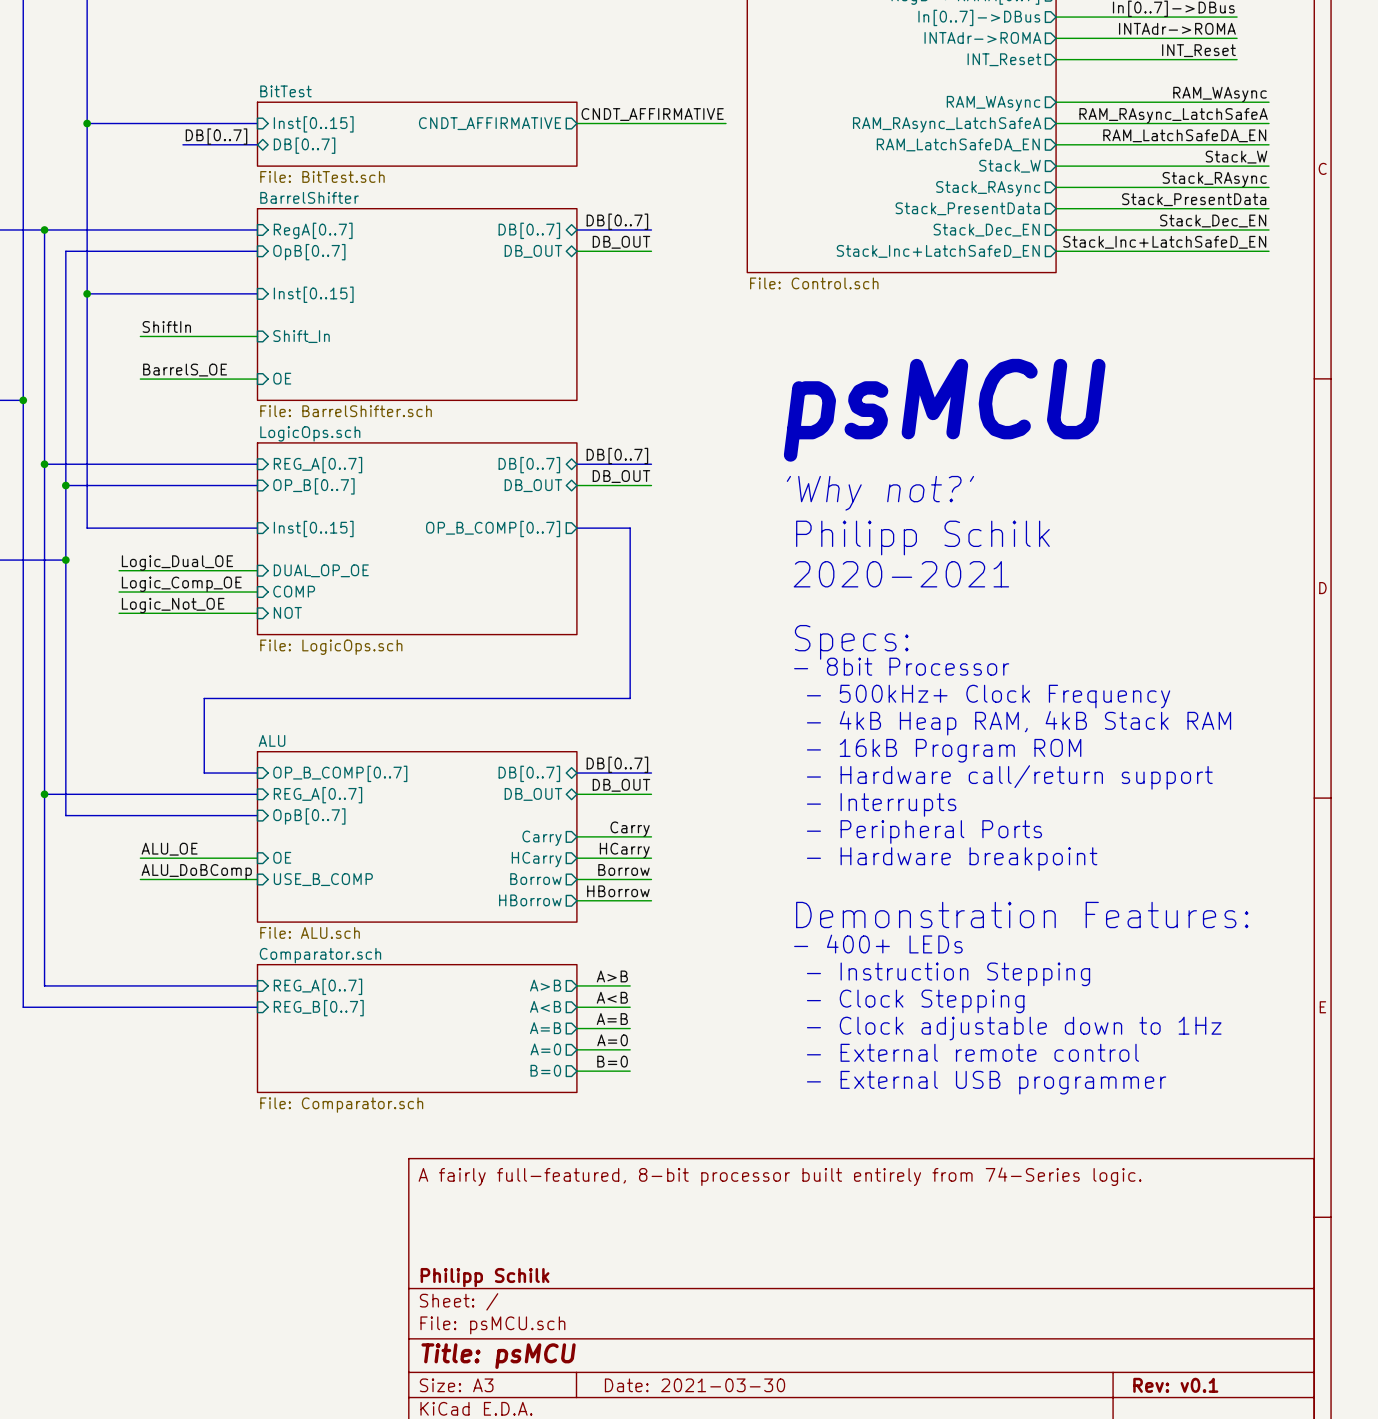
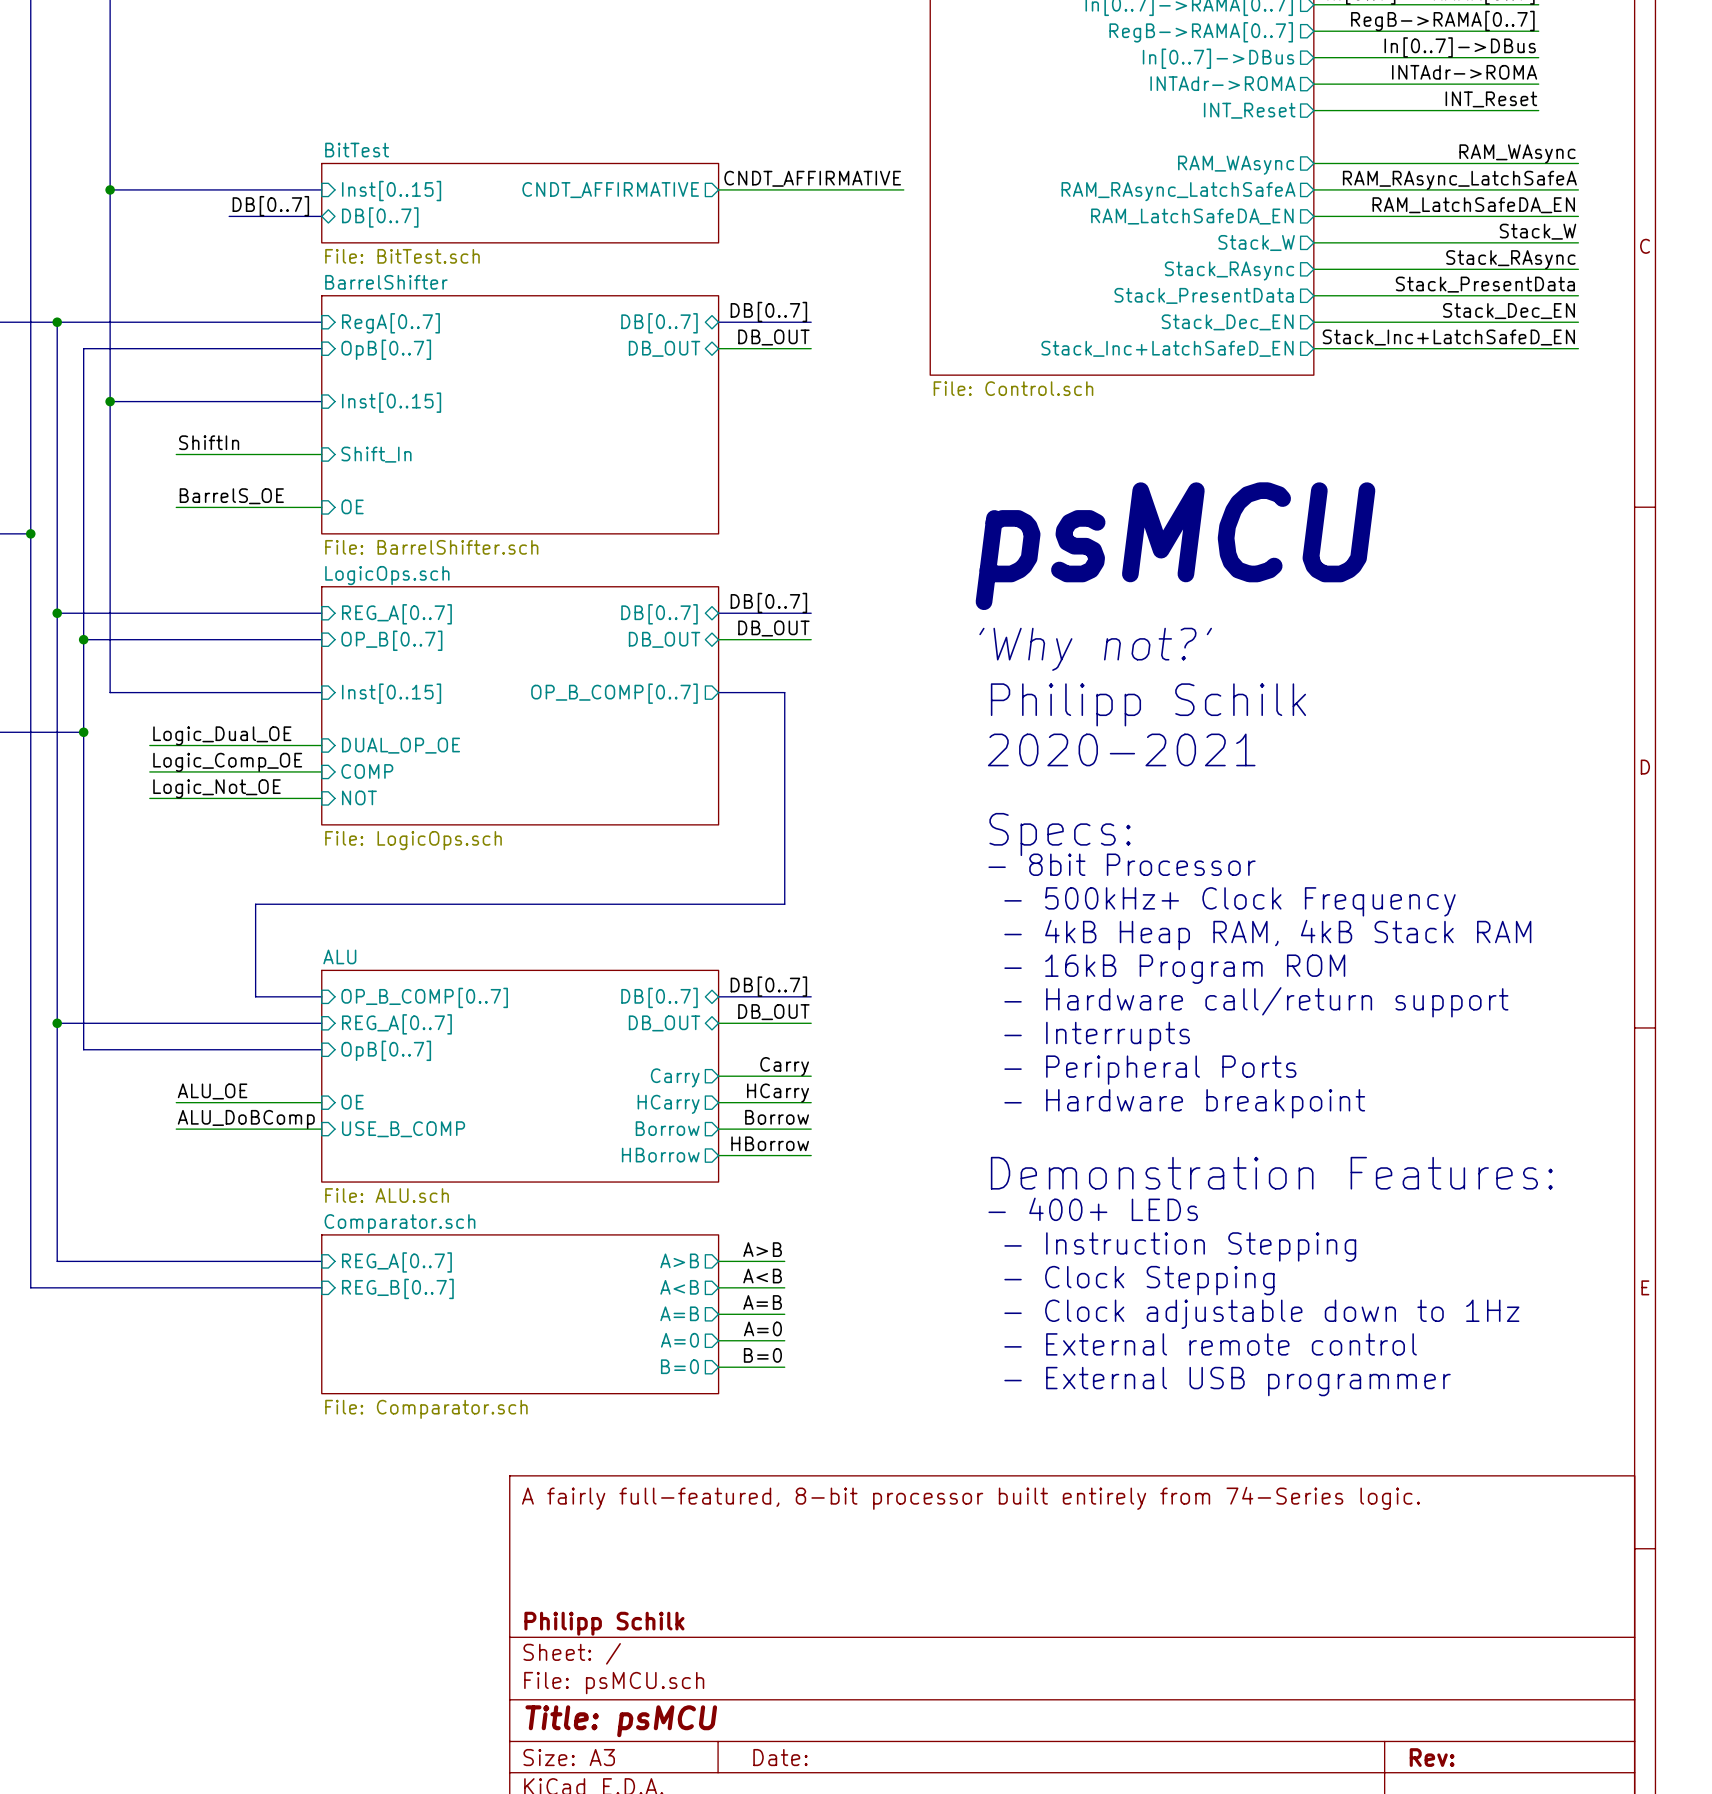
title block: Date: 2021-03-30 (695, 1385) -> Date: (780, 1757)
title block: Rev: v0.1 (1175, 1385) -> Rev: (1432, 1757)

